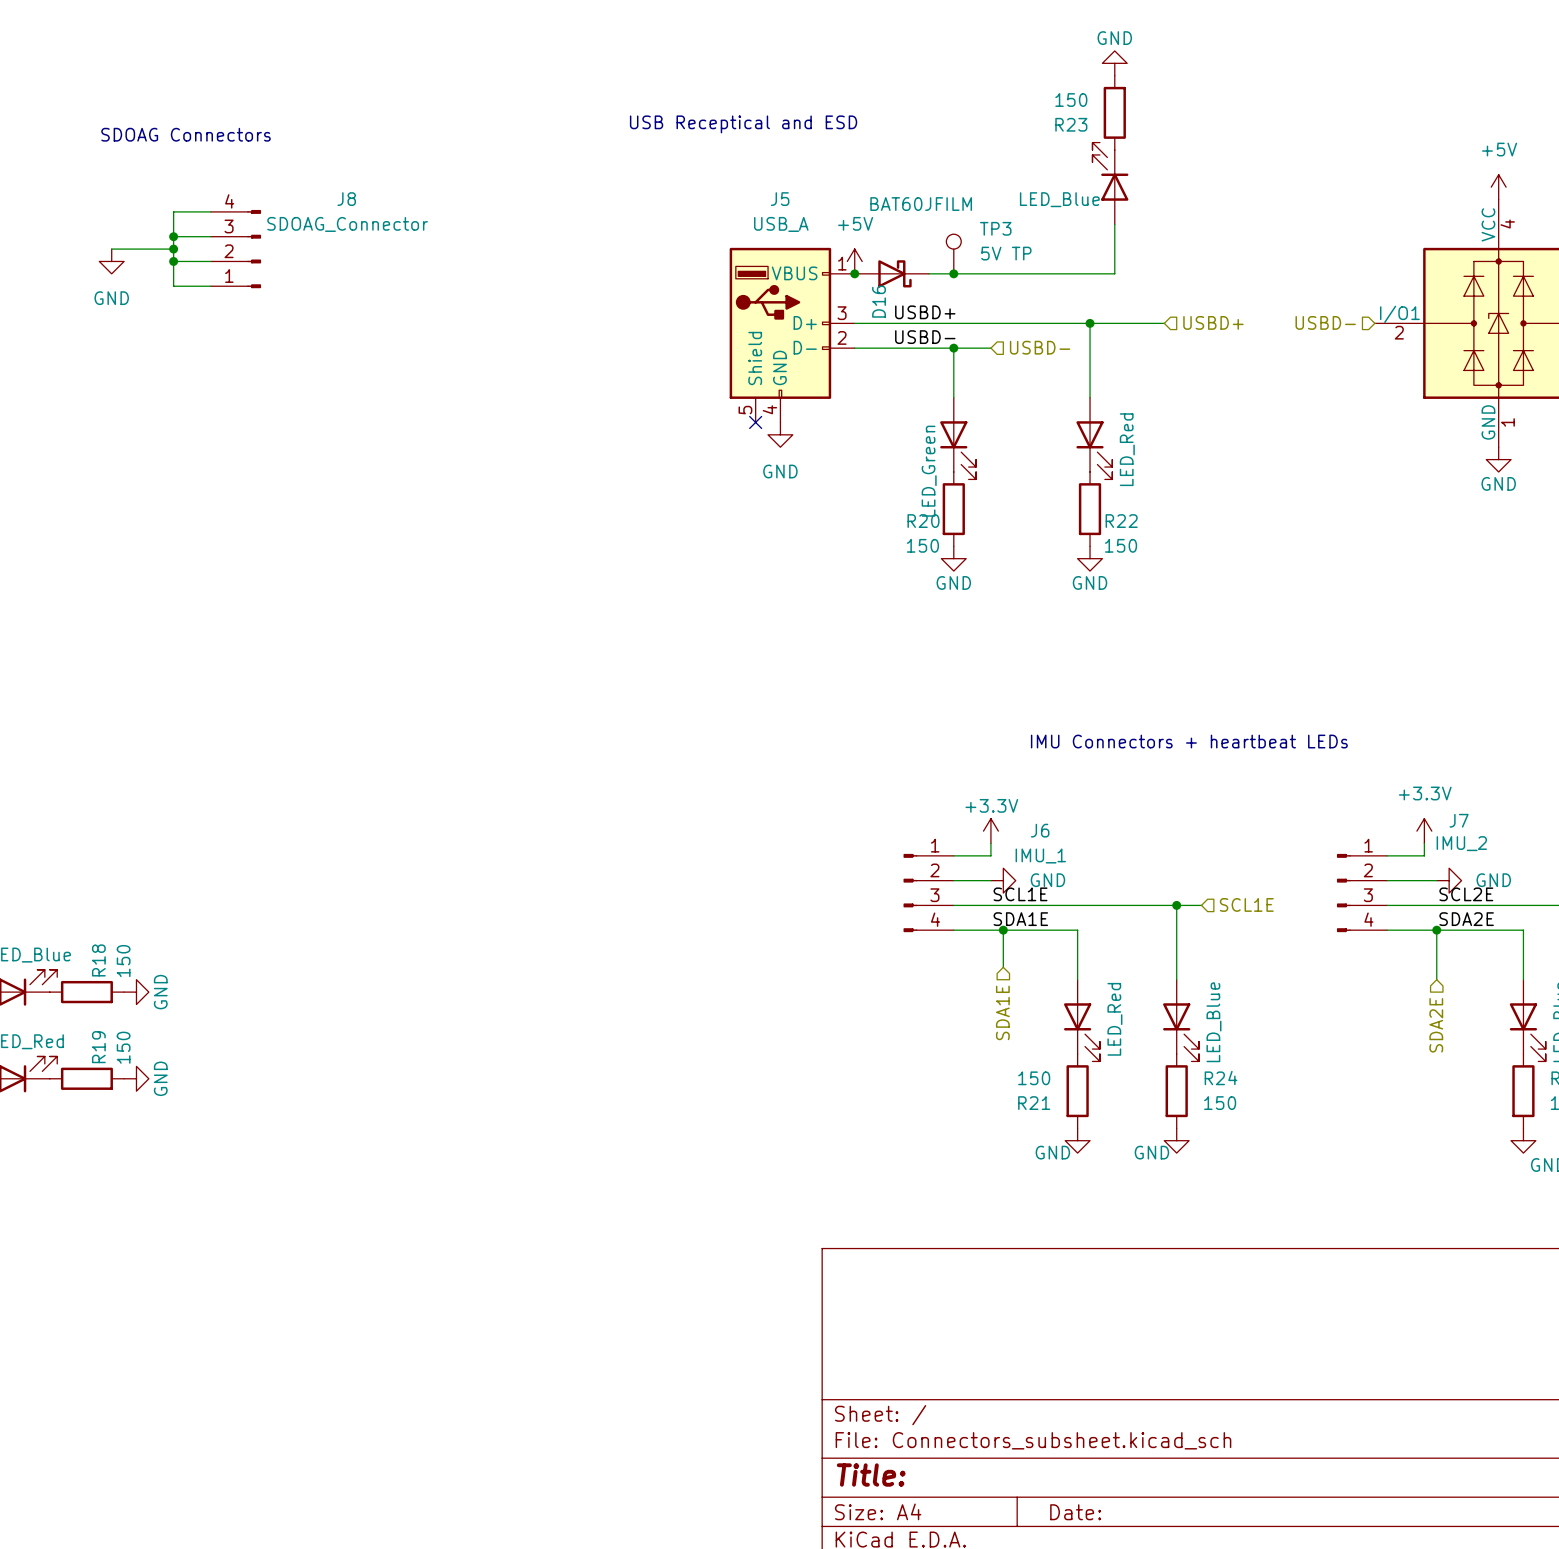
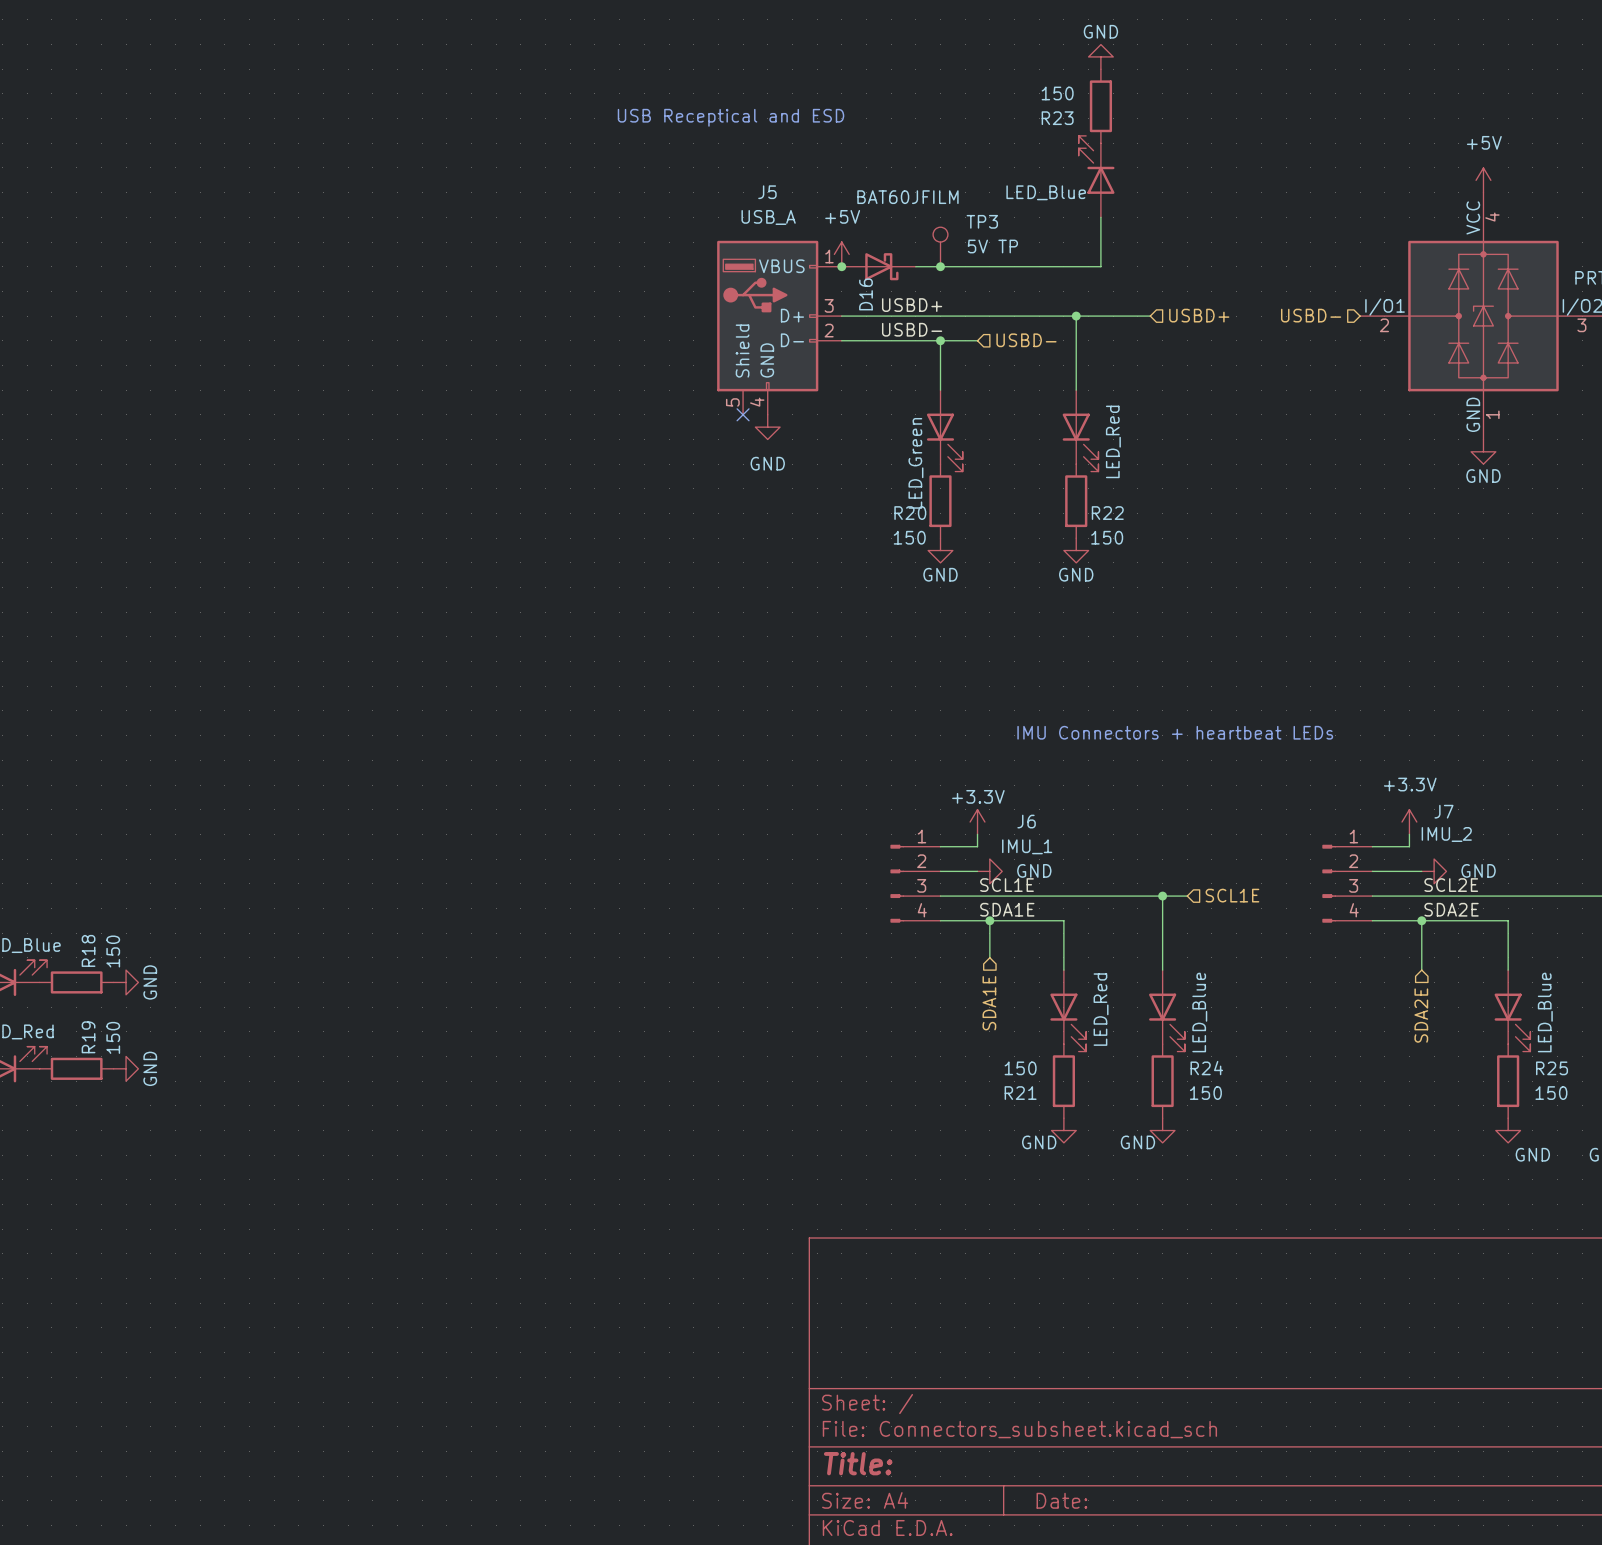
text: SDOAG Connectors (186, 134) -> none
wire: (210, 211) (173, 211) (173, 286) (210, 286) -> none
wire: (173, 236) (210, 236) -> none
junction: (173, 236) -> none
wire: (111, 249) (173, 249) -> none
junction: (173, 249) -> none
J8: SDOAG_Connector (235, 249) -> none
power symbol: GND (111, 261) -> none
wire: (173, 261) (210, 261) -> none
junction: (173, 261) -> none

